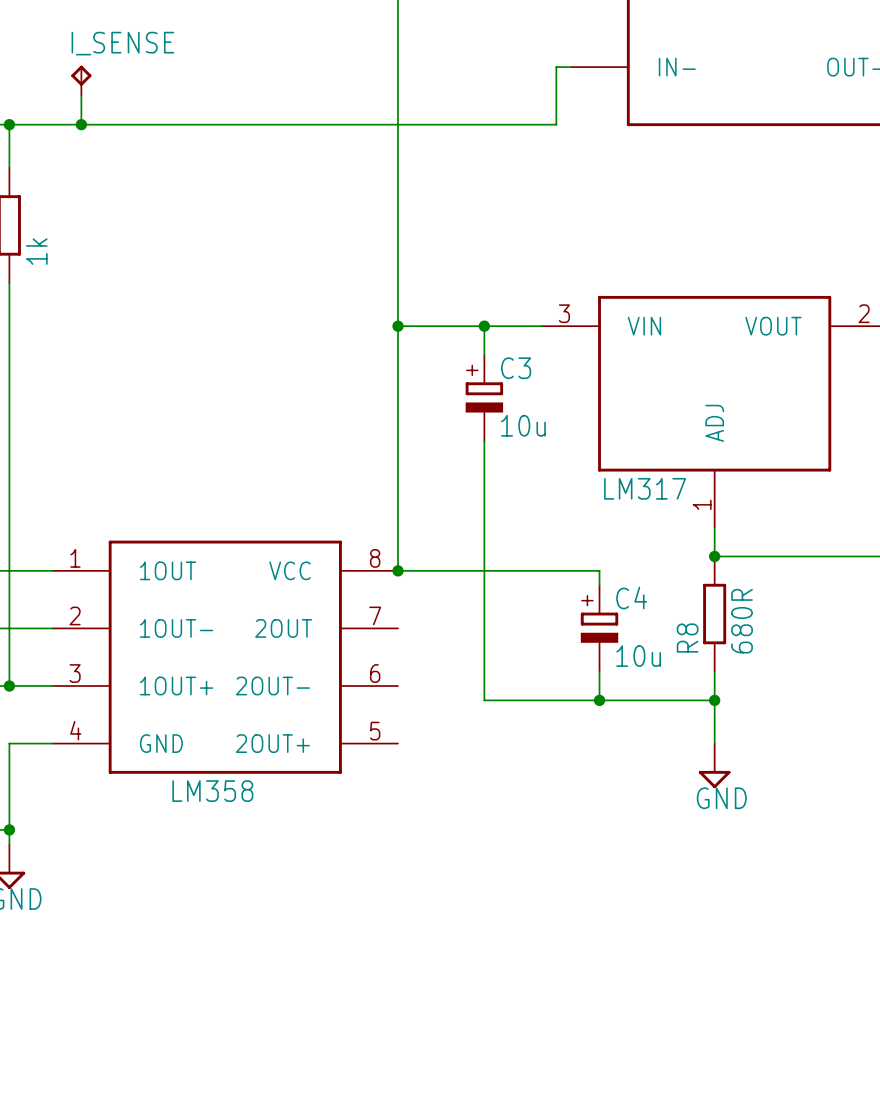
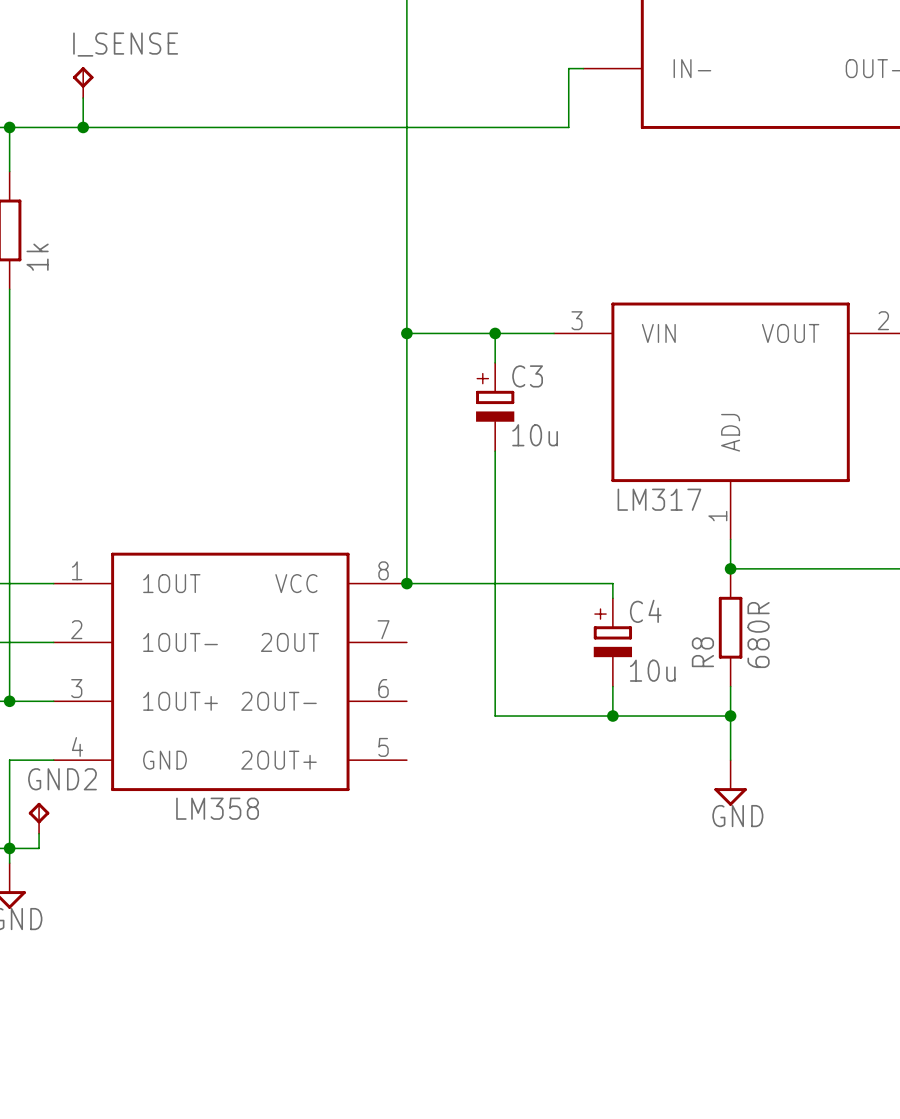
GND2: none -> (39, 818)
wire: none -> (39, 833) (39, 848) (9, 848)

